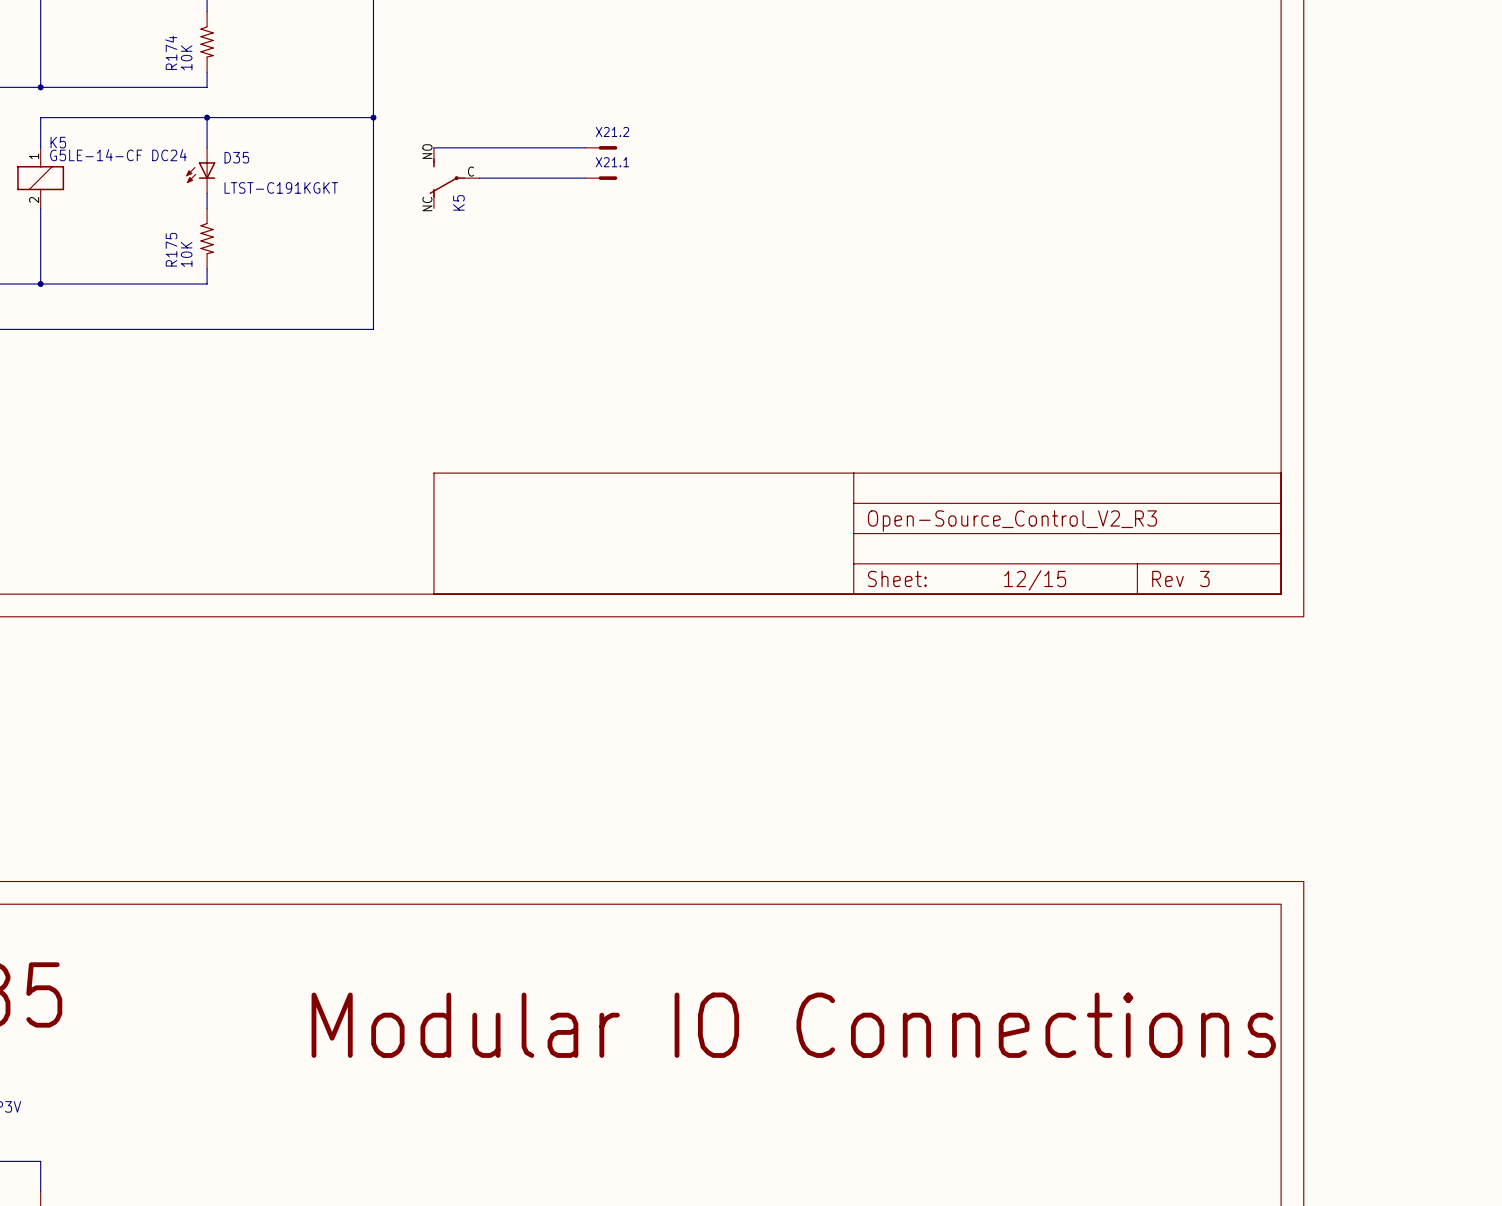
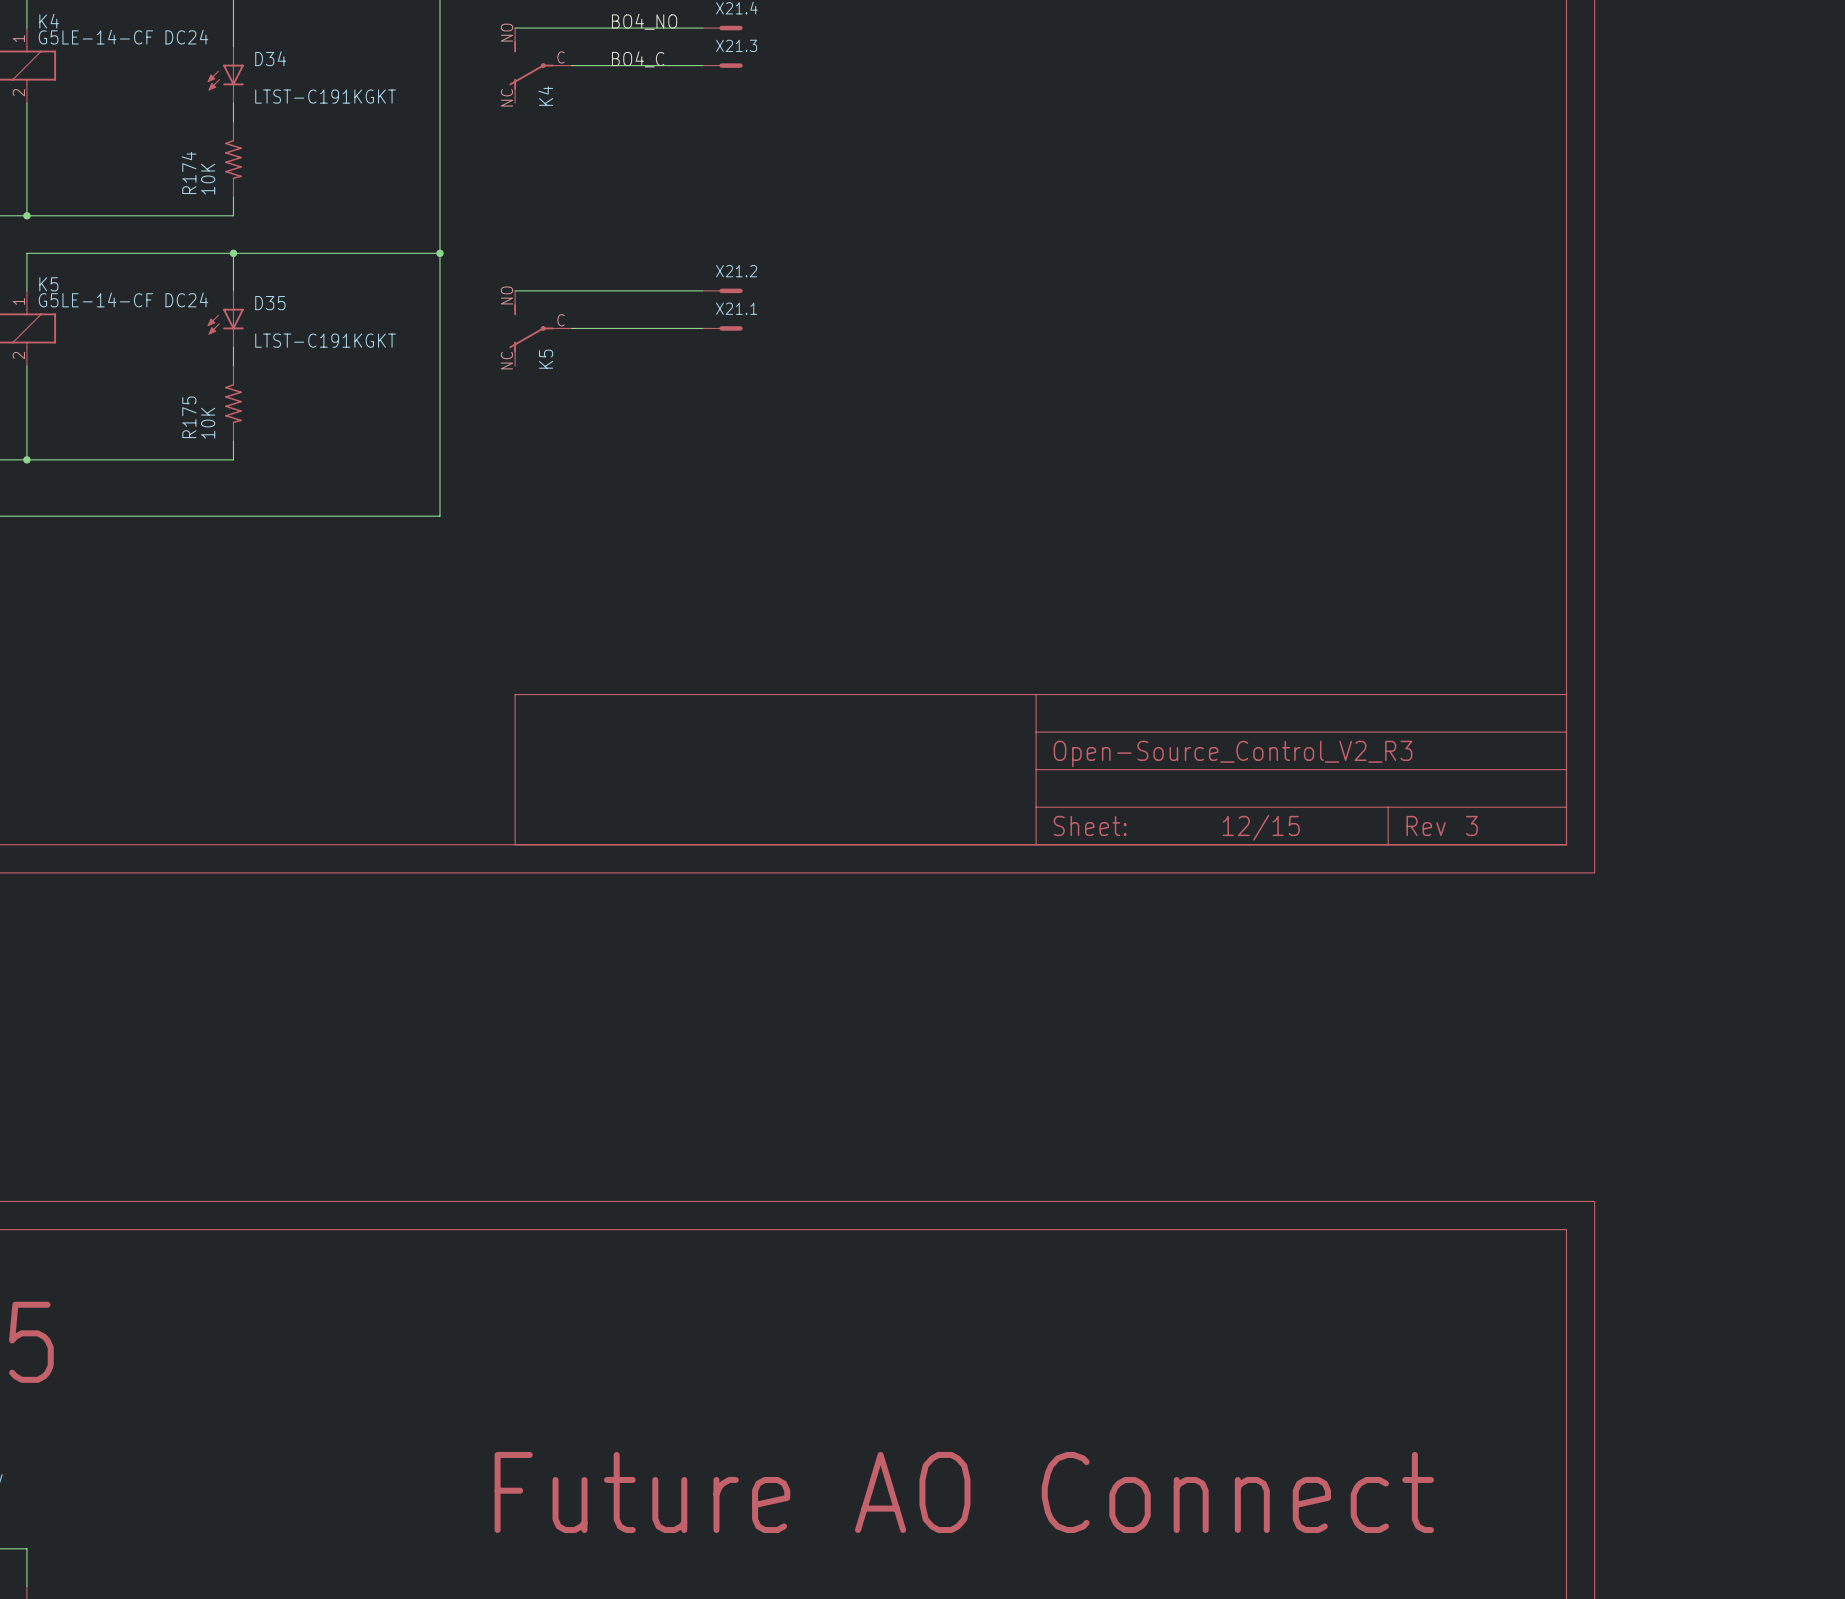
text: Modular IO Connections (793, 1025) -> Future AO Connect (964, 1492)

